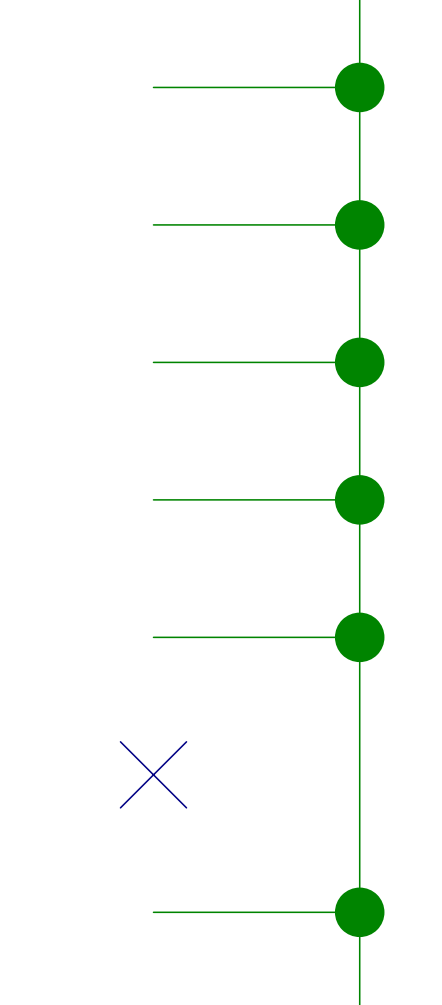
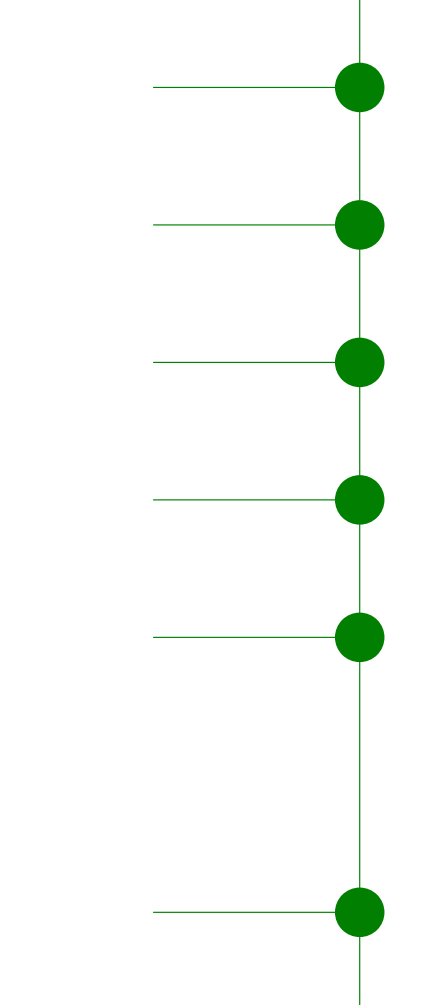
no-connect mark: (153, 774) -> none

